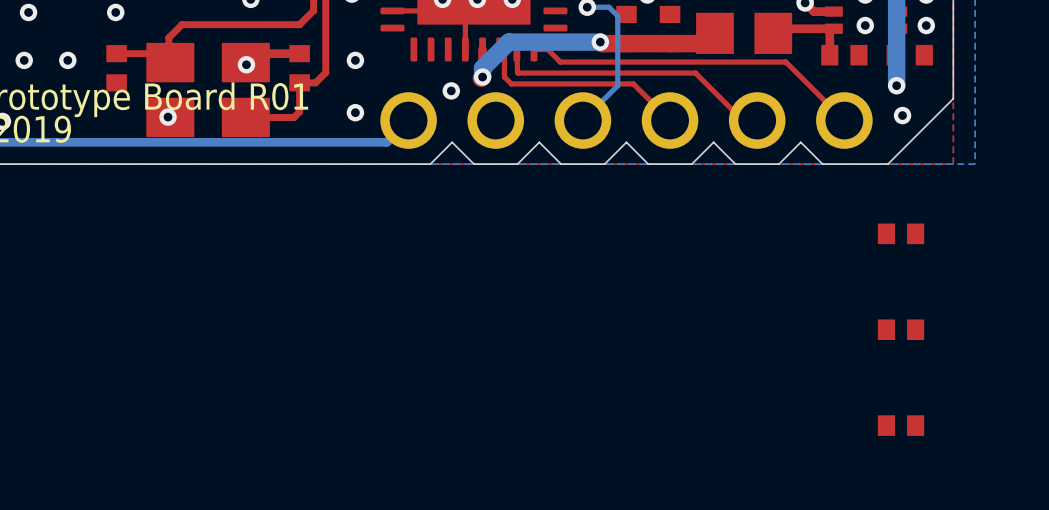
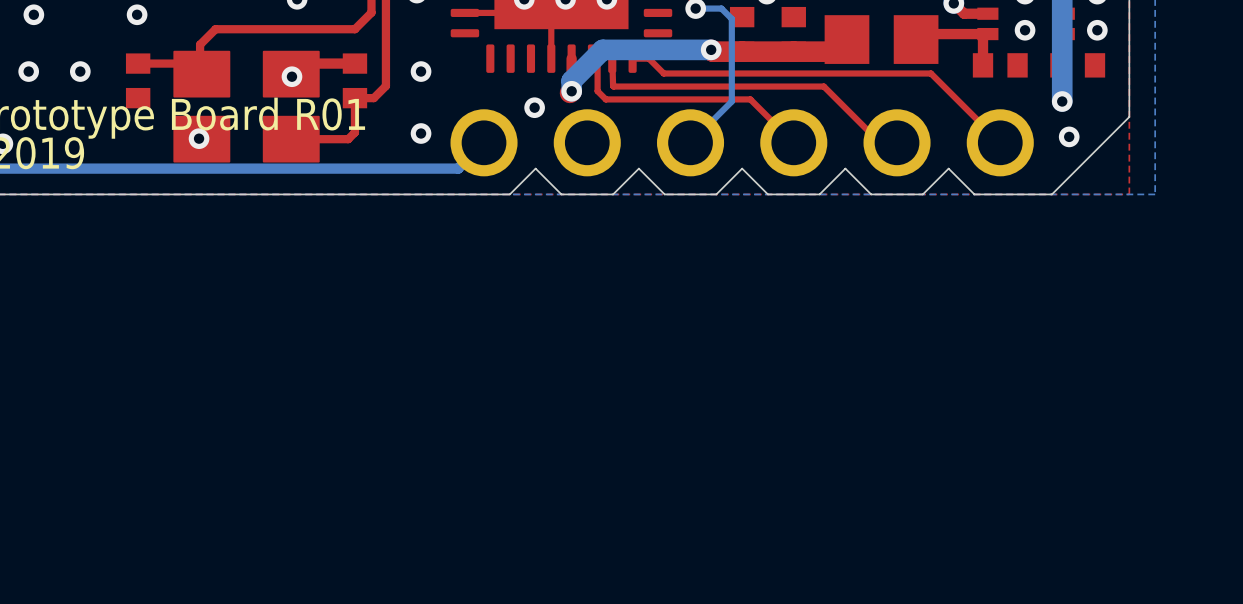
part: (901, 233) -> none
part: (901, 329) -> none
part: (901, 425) -> none

